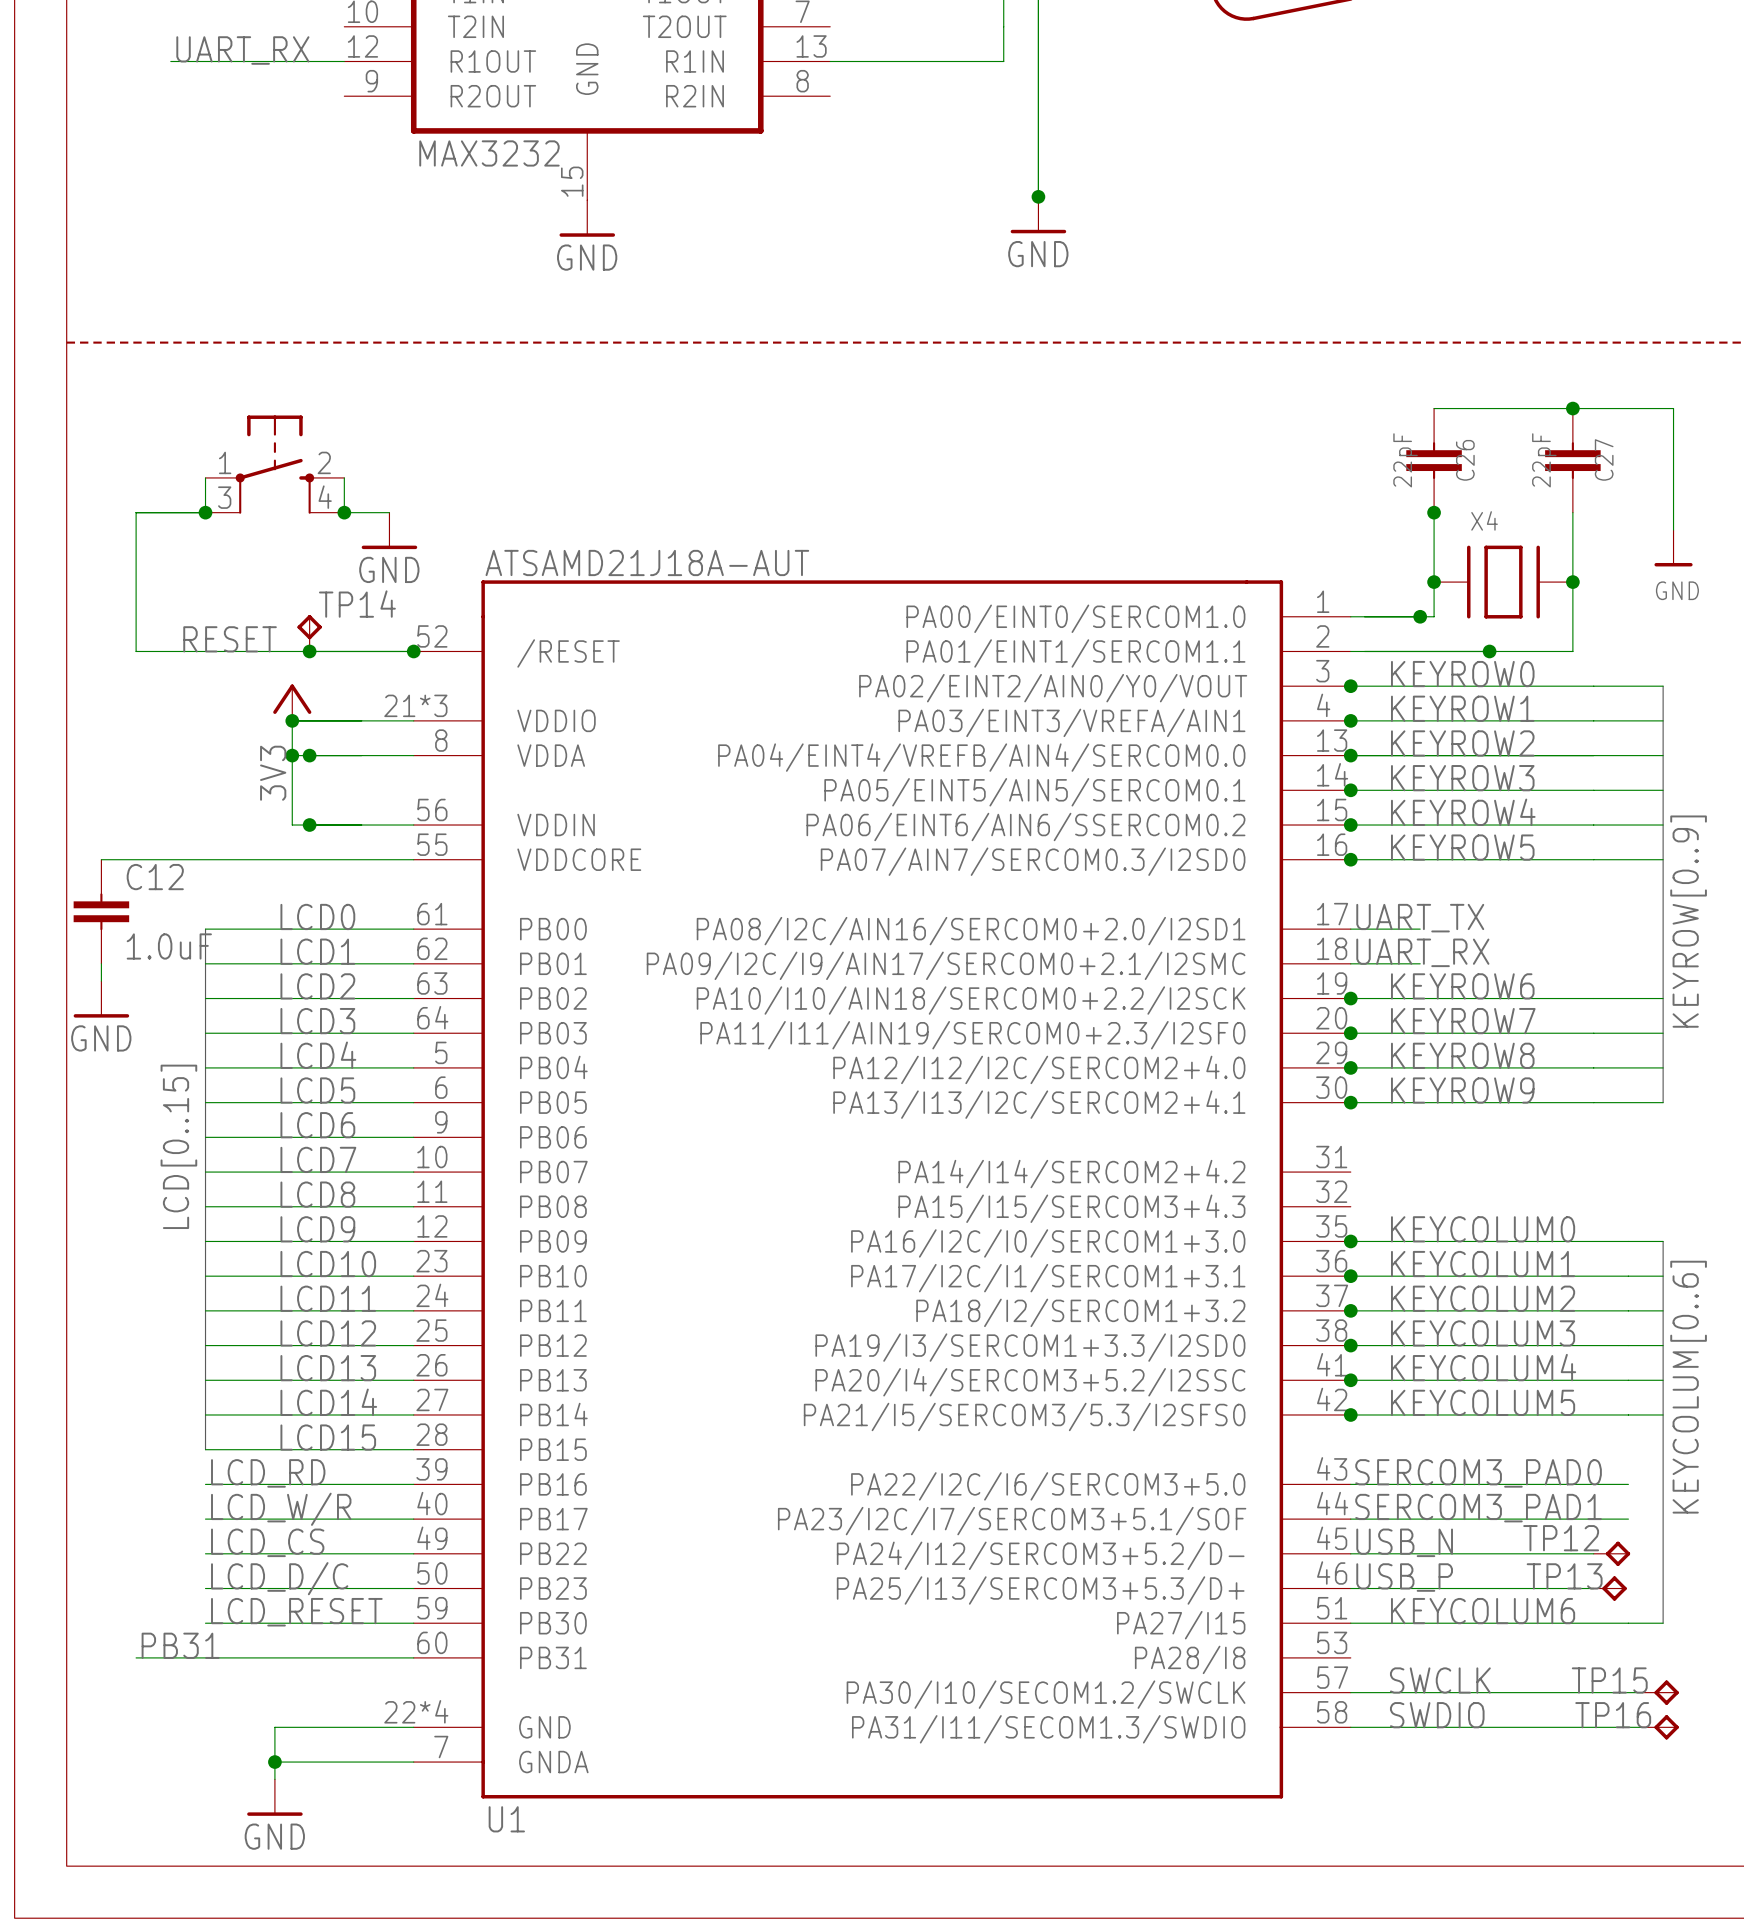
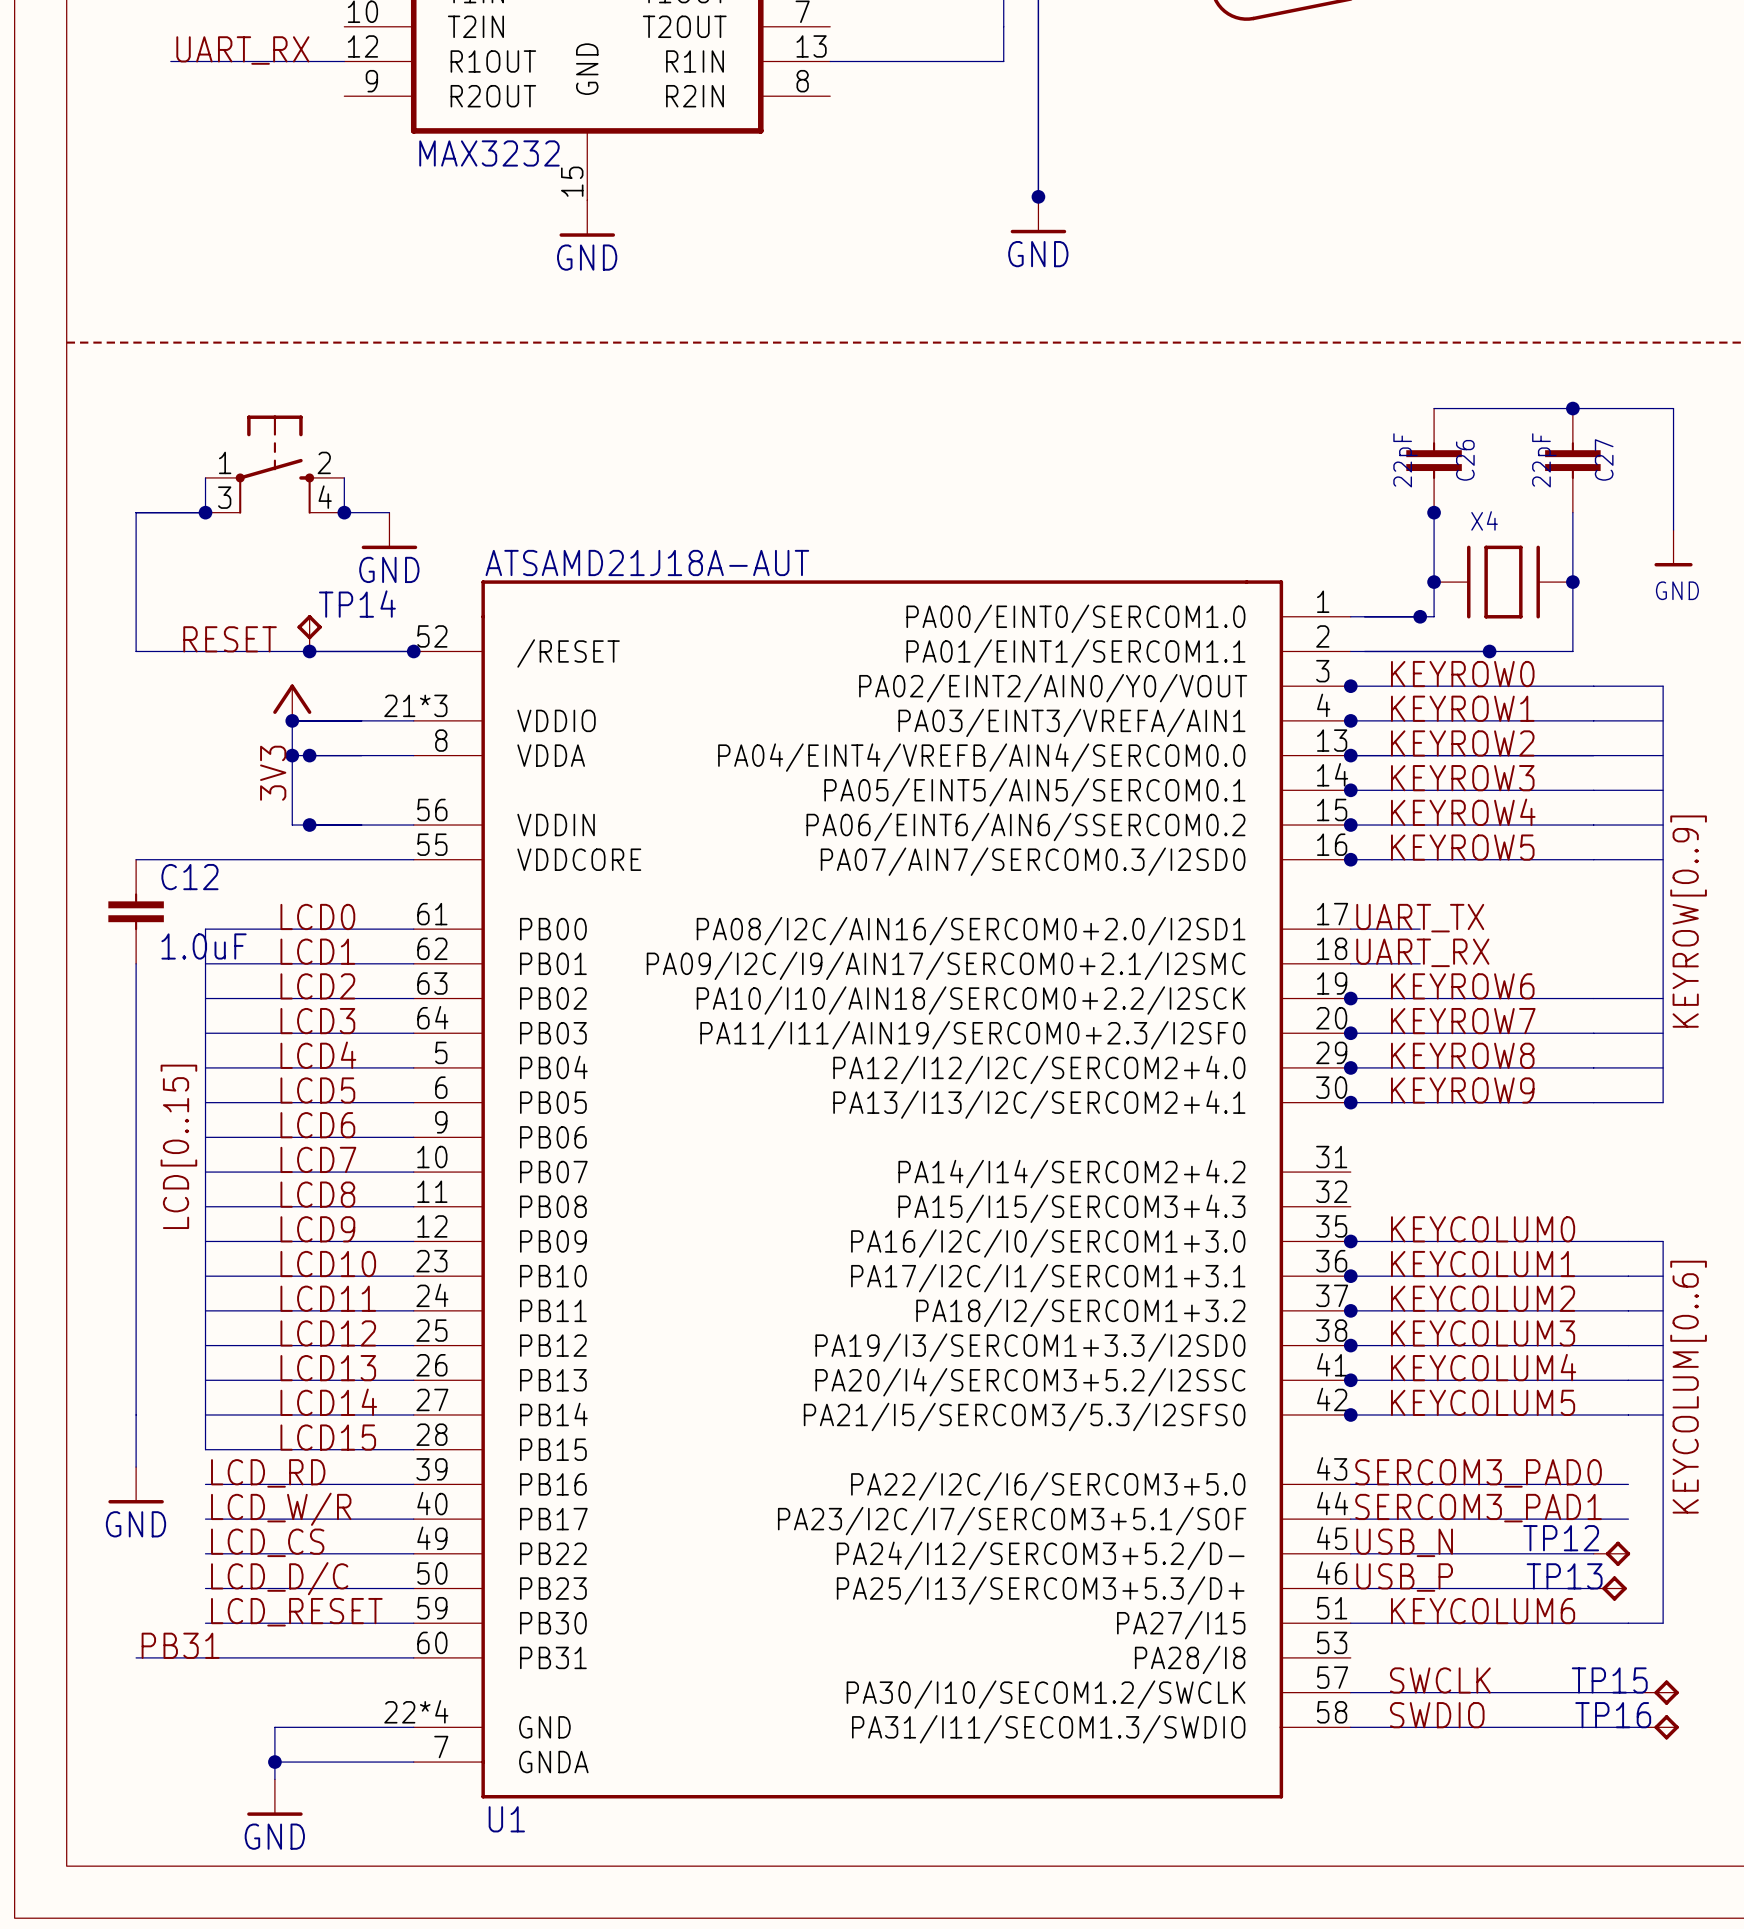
wire: (101, 859) (136, 859) -> none
C12 position: (101, 911) -> (136, 911)
wire: (101, 963) (101, 981) -> none
wire: none -> (136, 963) (136, 1467)
power symbol: GND (101, 999) -> none
power symbol: none -> GND (136, 1485)

